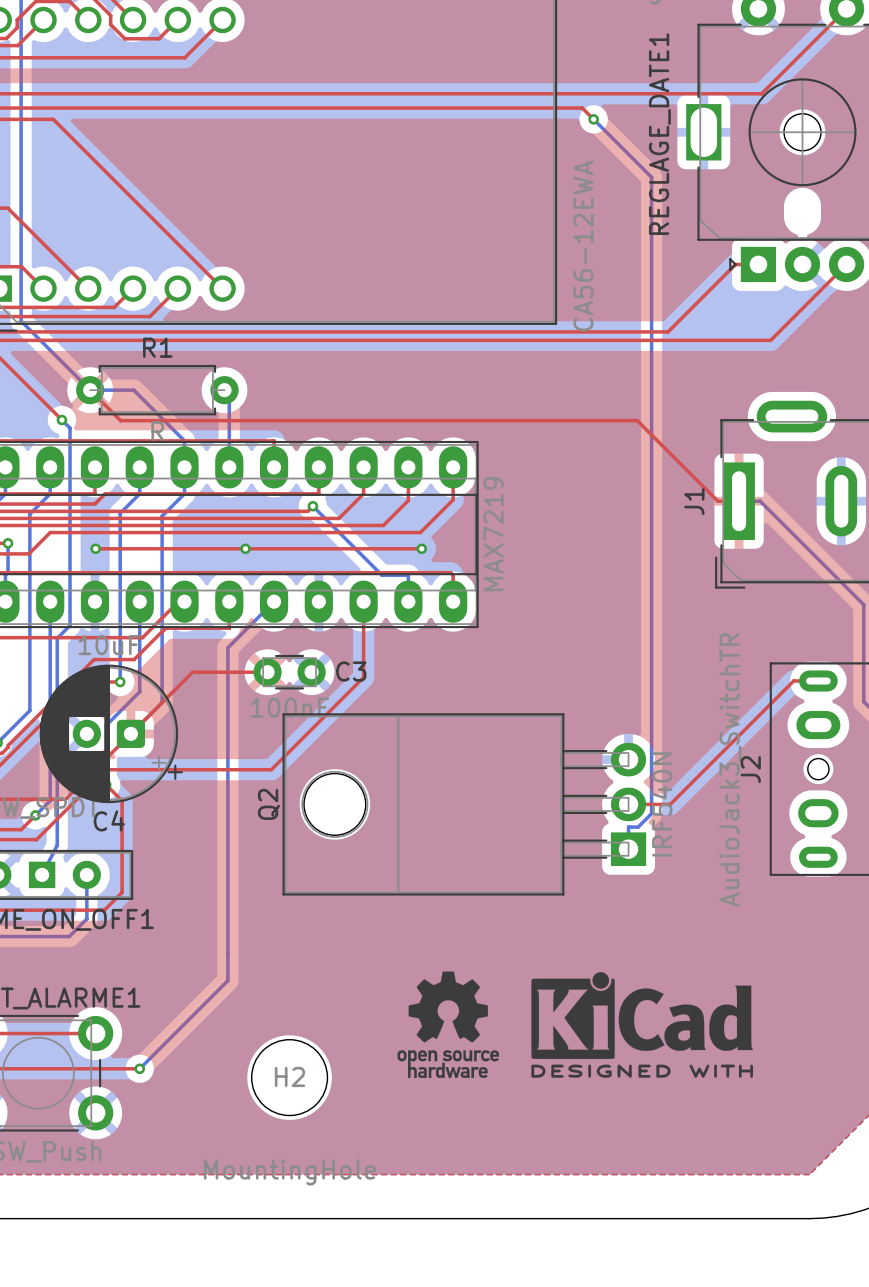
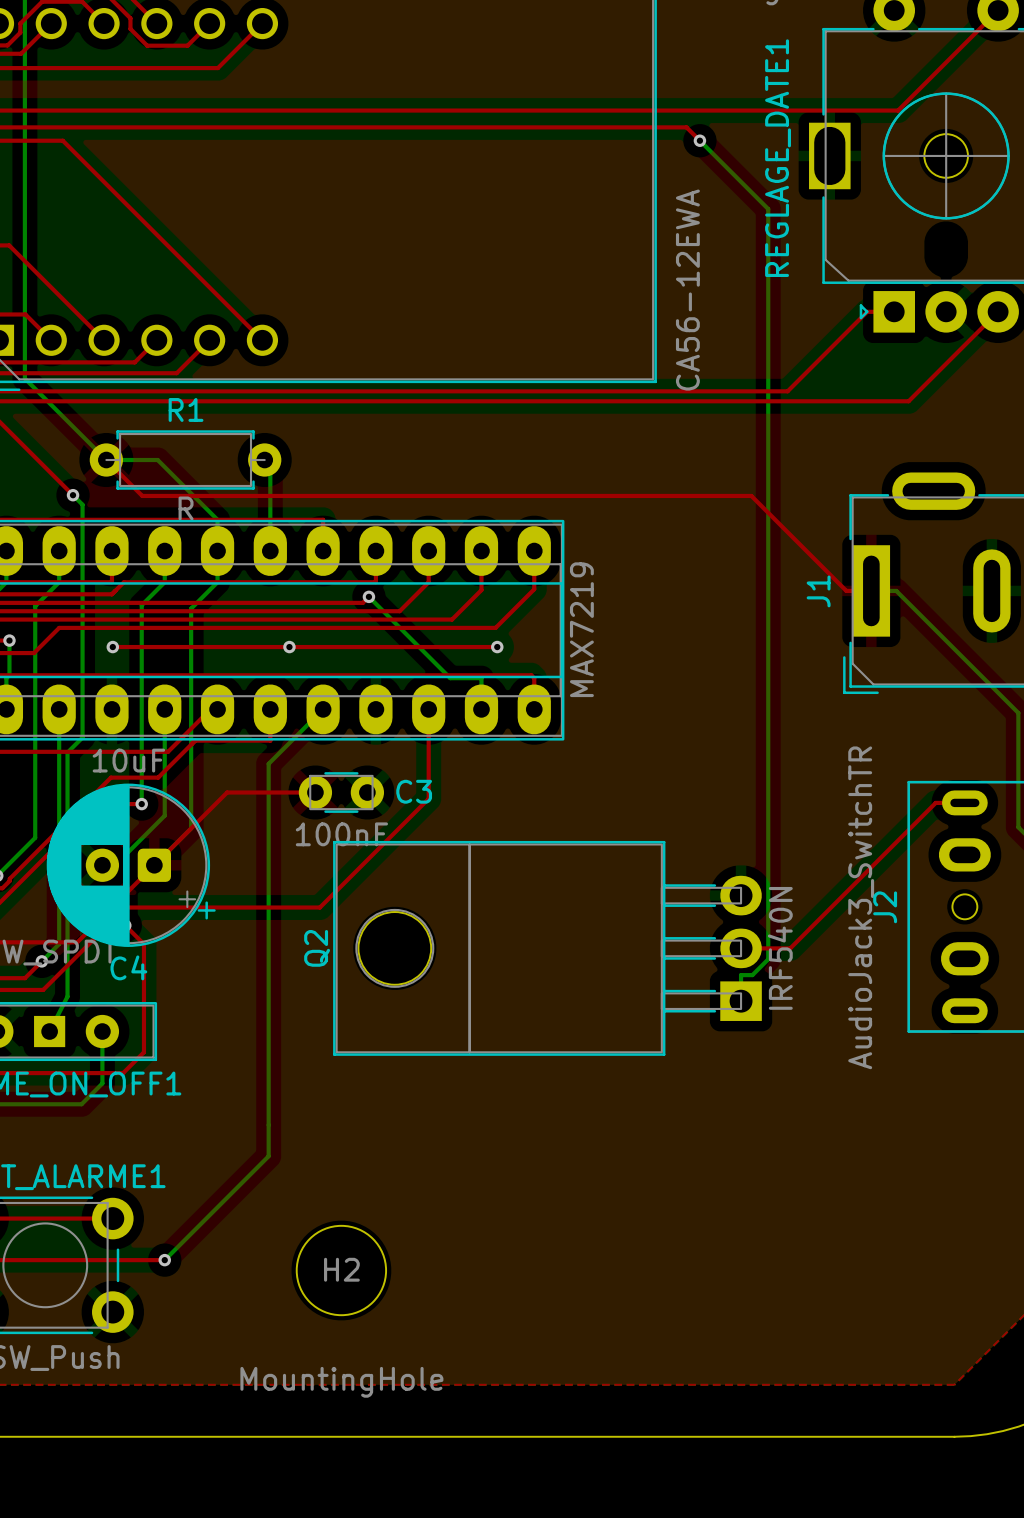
drawing: [397, 971, 500, 1079] -> none
drawing: [531, 972, 754, 1078] -> none

